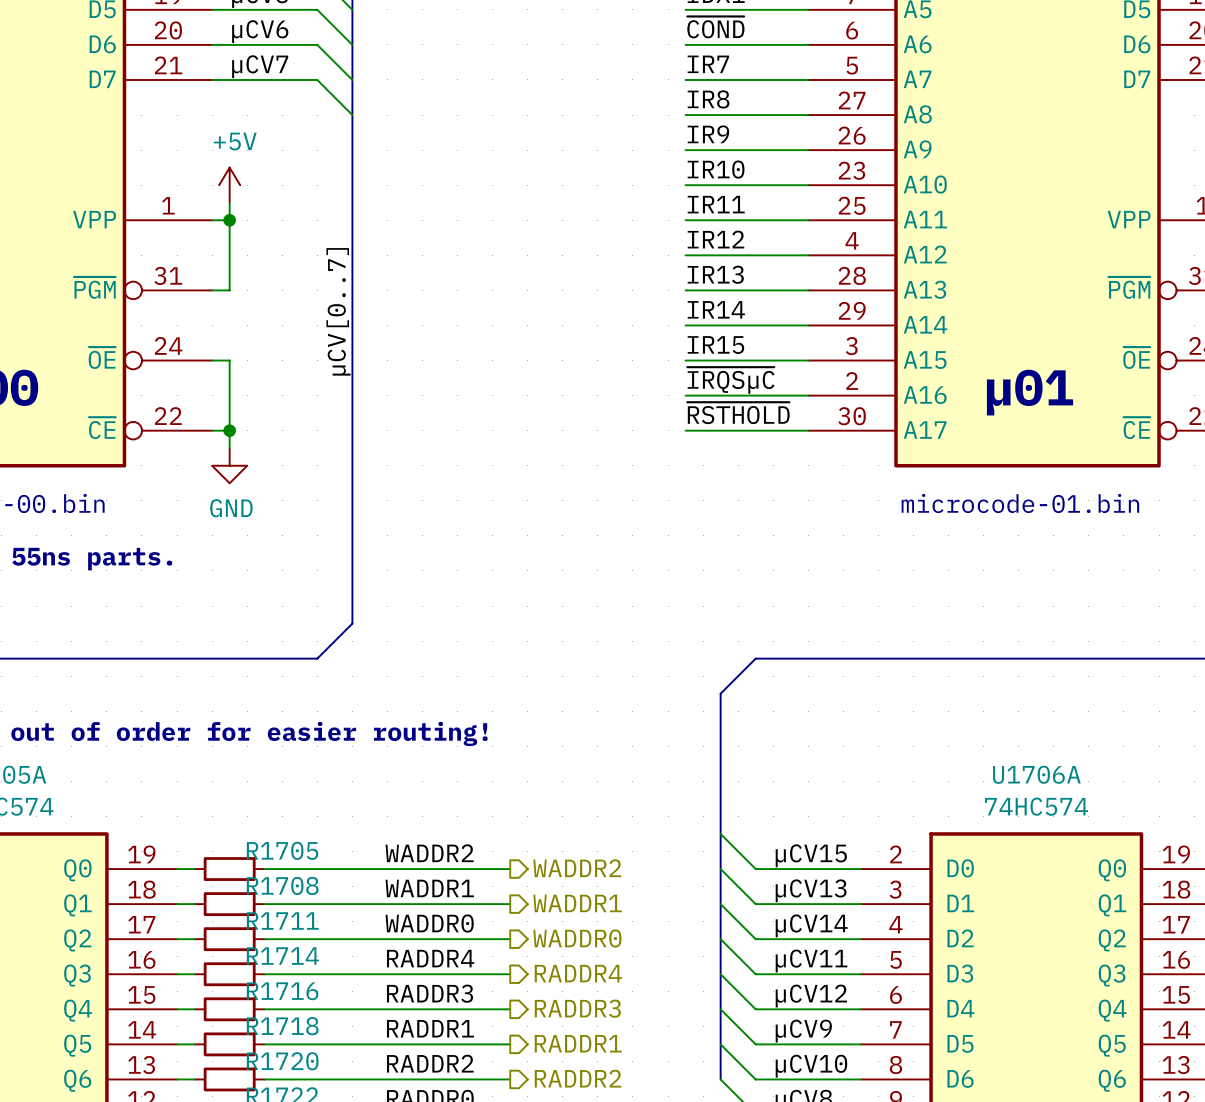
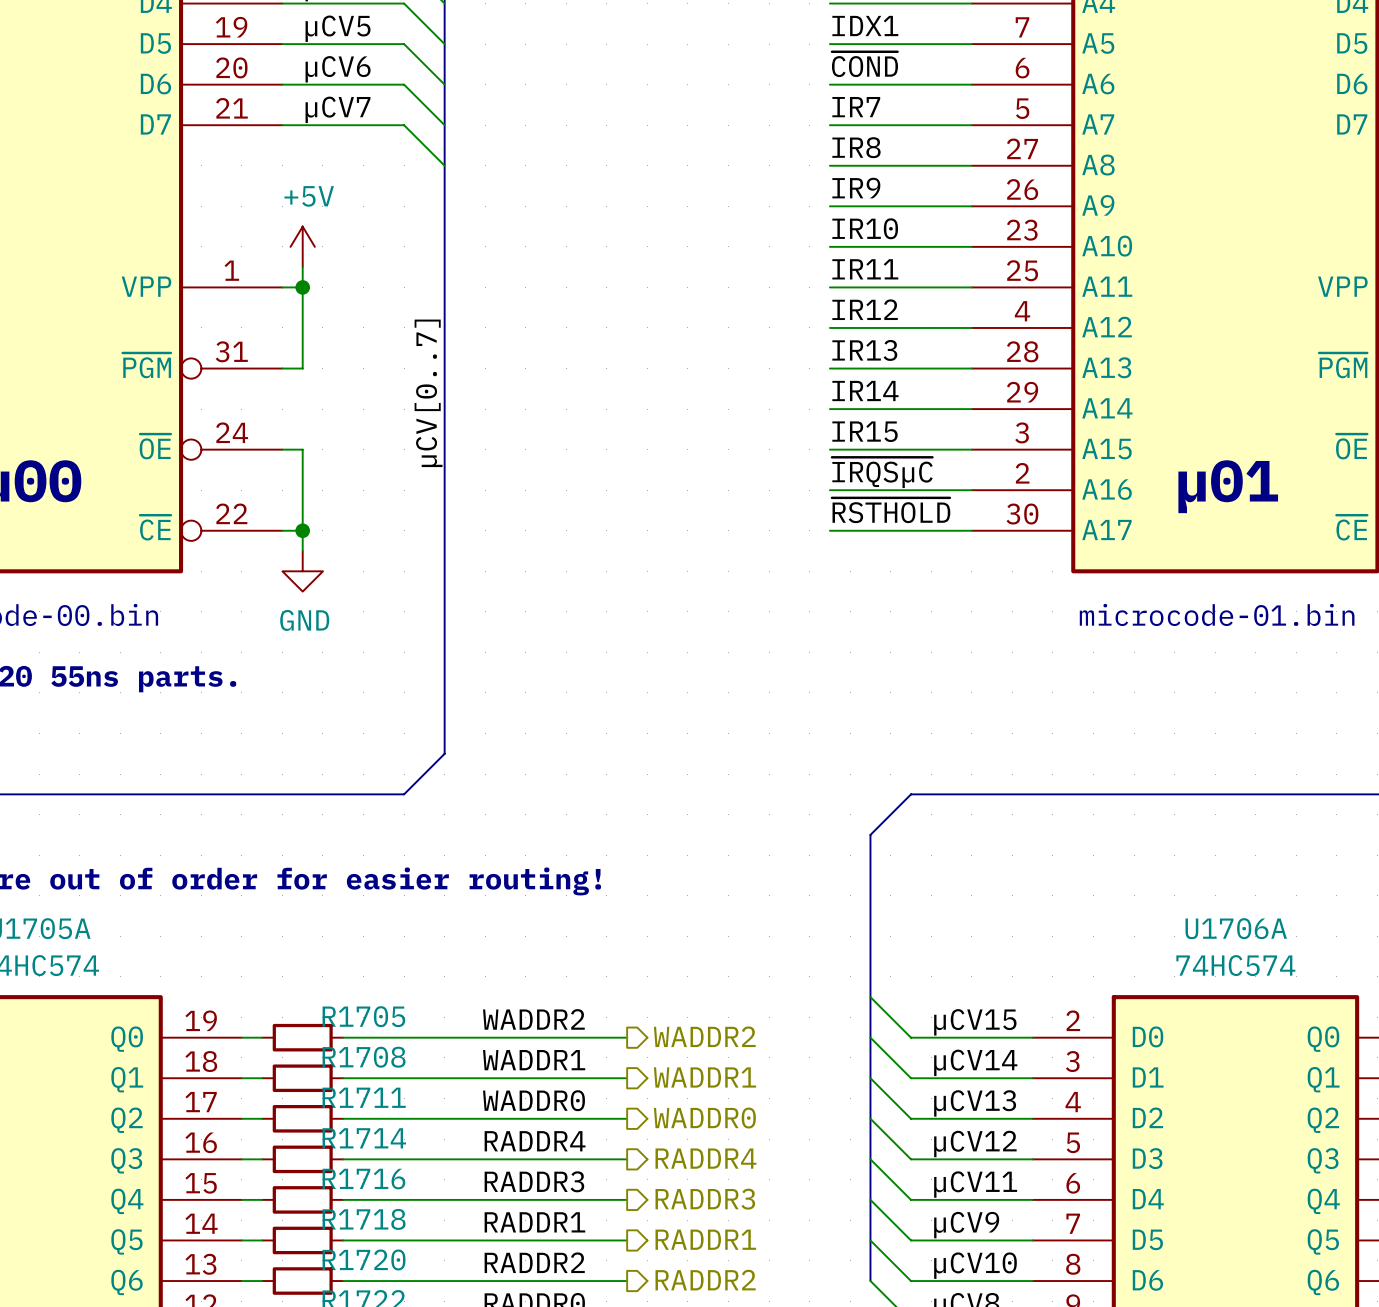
label: µCV13 (811, 890) -> µCV14 (975, 1062)
label: µCV14 (811, 925) -> µCV13 (975, 1103)
label: µCV11 (811, 960) -> µCV12 (975, 1143)
label: µCV12 (811, 996) -> µCV11 (975, 1184)

